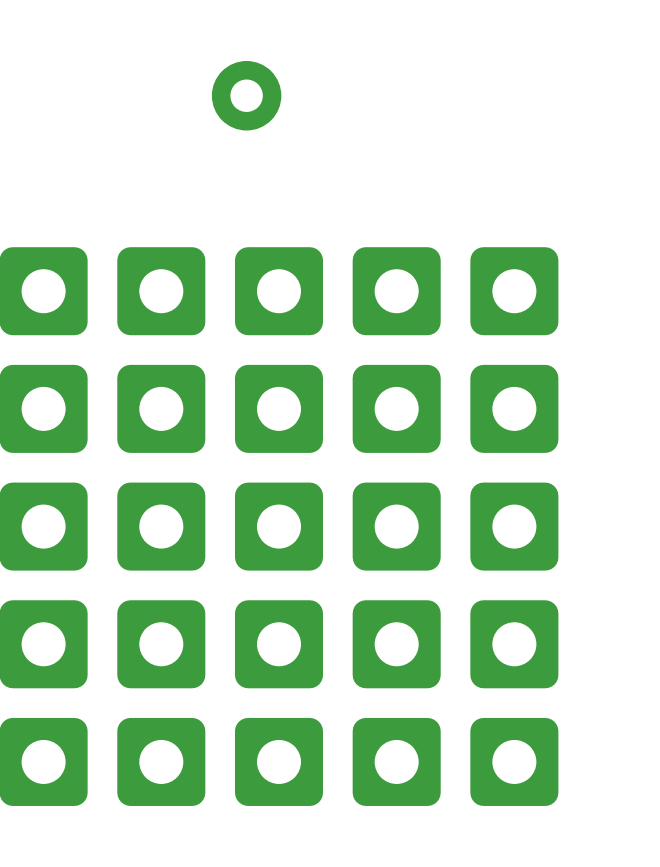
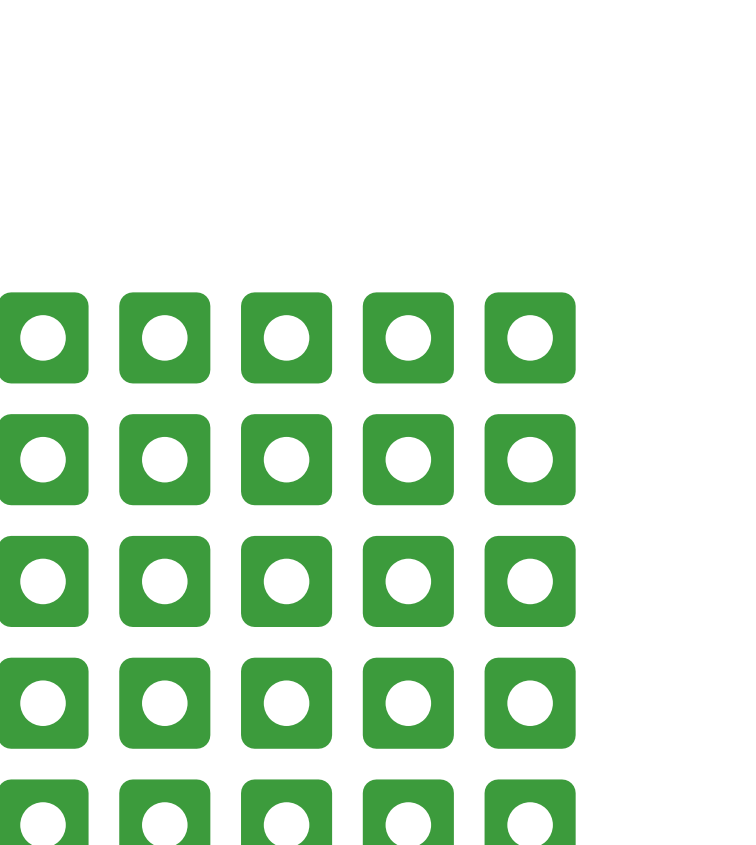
part: (246, 95) -> none

